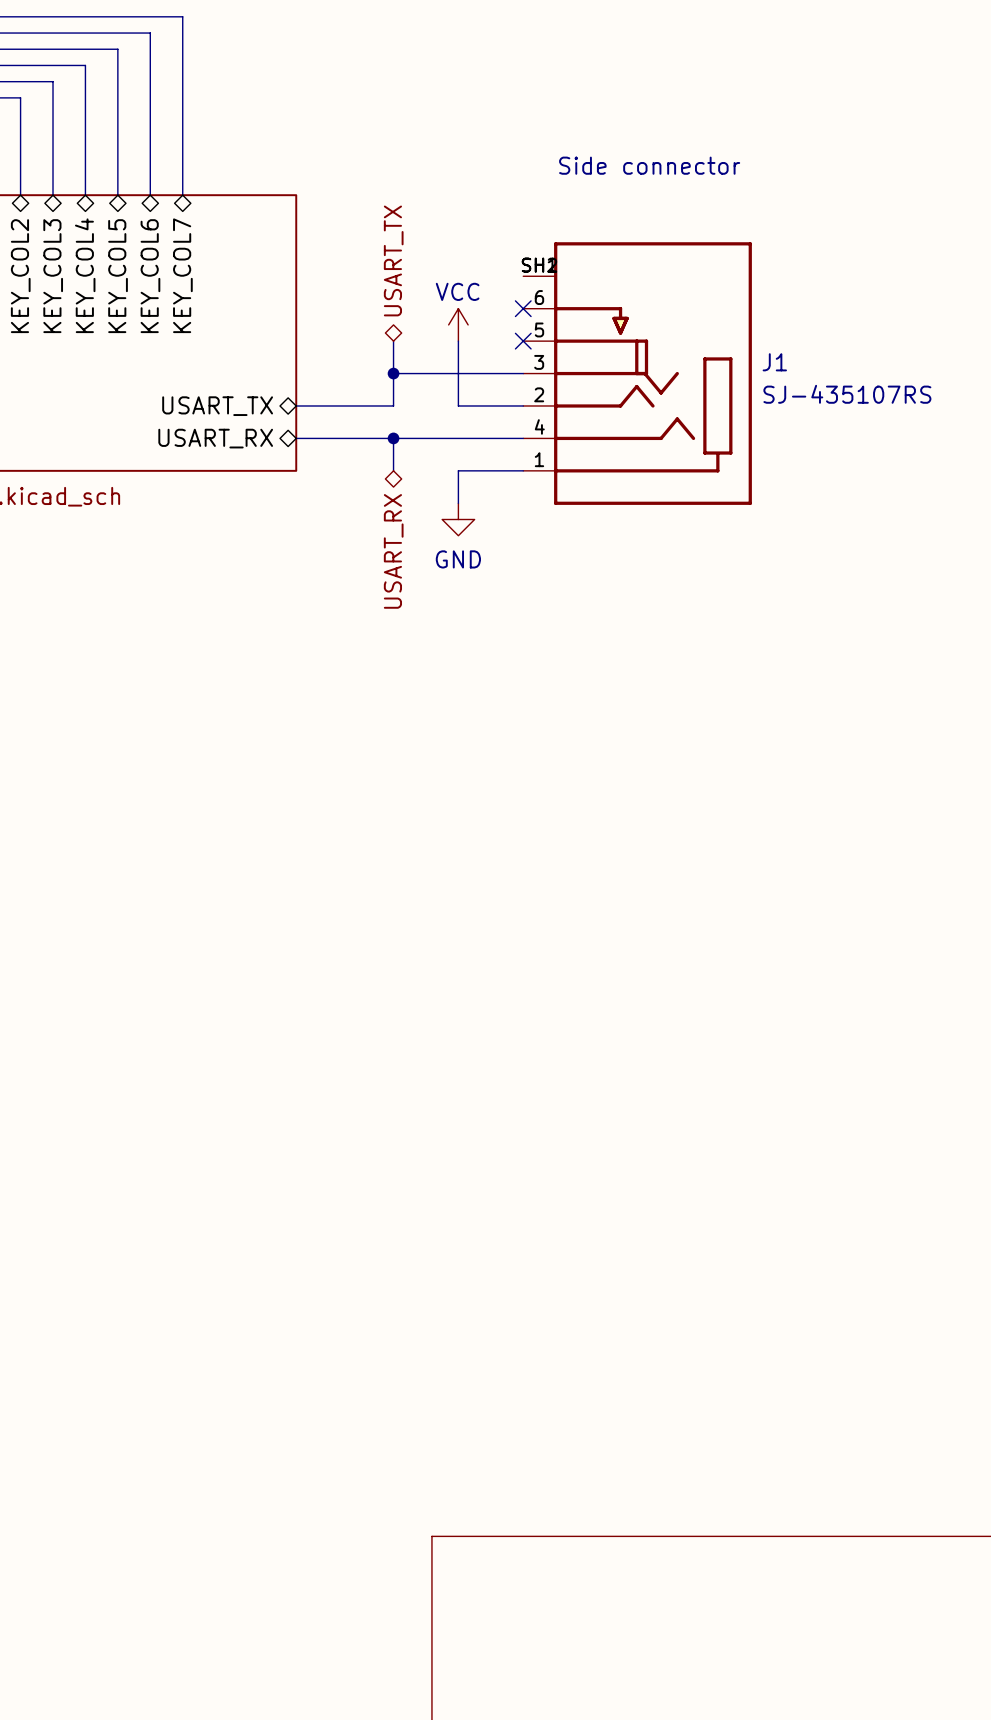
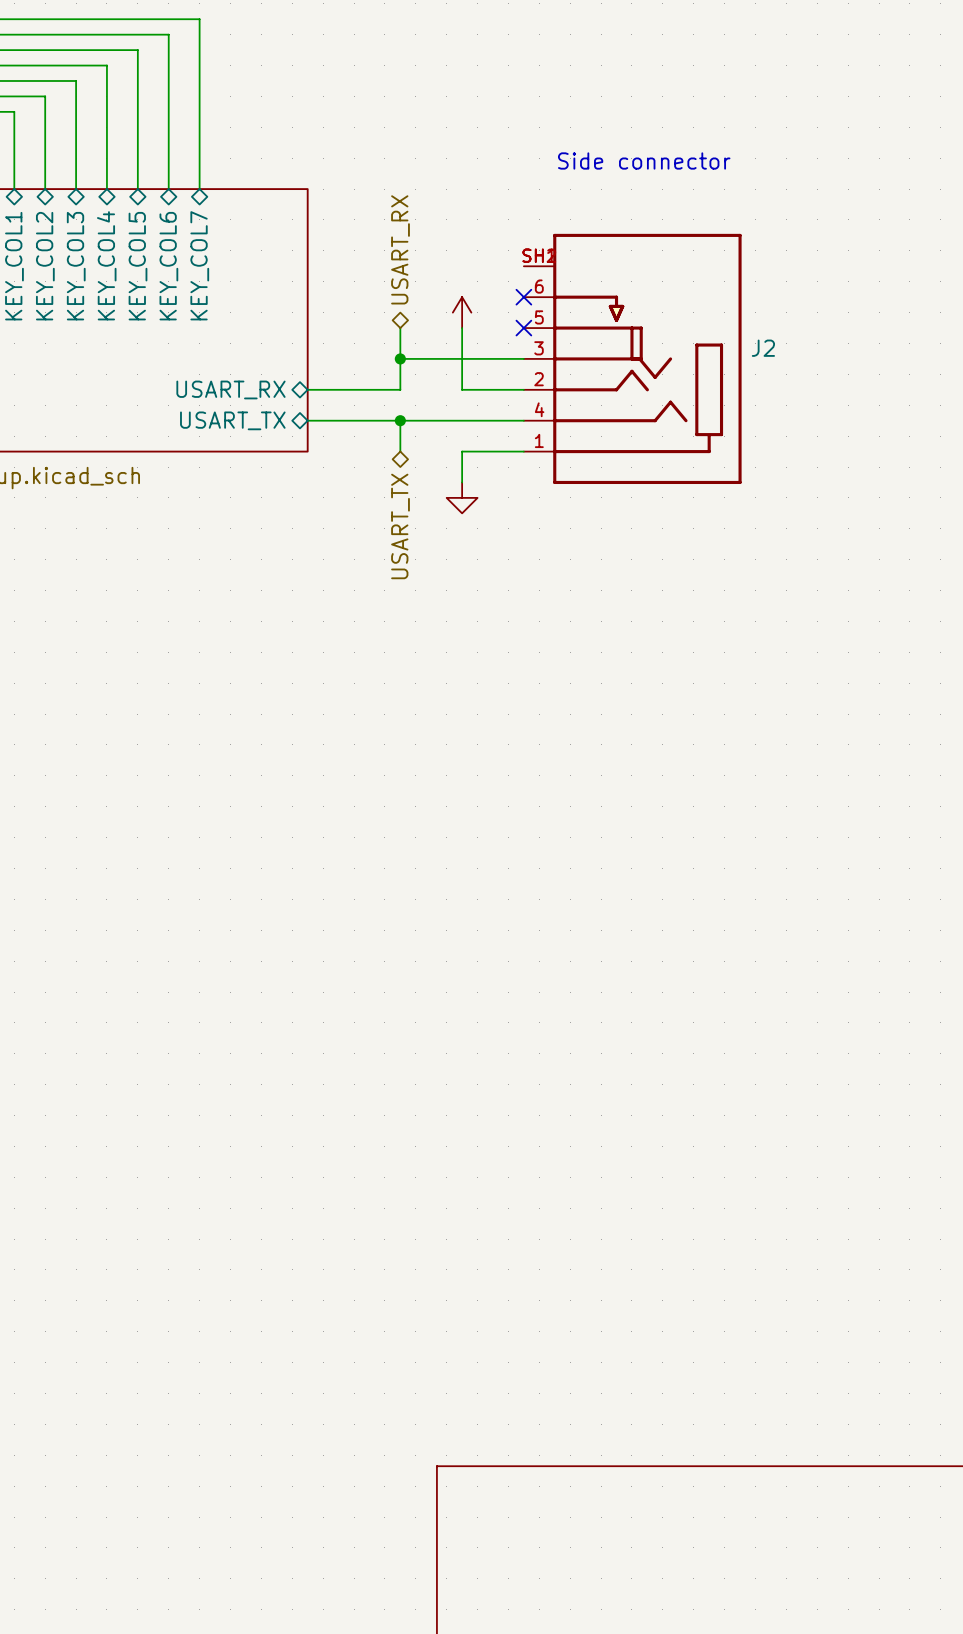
hierarchical label: USART_TX (393, 260) -> USART_RX (400, 249)
power symbol text: VCC (457, 291) -> none
J1 name: J1 (774, 362) -> J2 (763, 348)
J1 value: SJ-435107RS (847, 394) -> none
sheet pin: USART_TX (217, 406) -> USART_RX (230, 389)
sheet pin: USART_RX (215, 438) -> USART_TX (232, 420)
hierarchical label: USART_RX (393, 551) -> USART_TX (400, 526)
power symbol text: GND (458, 559) -> none

